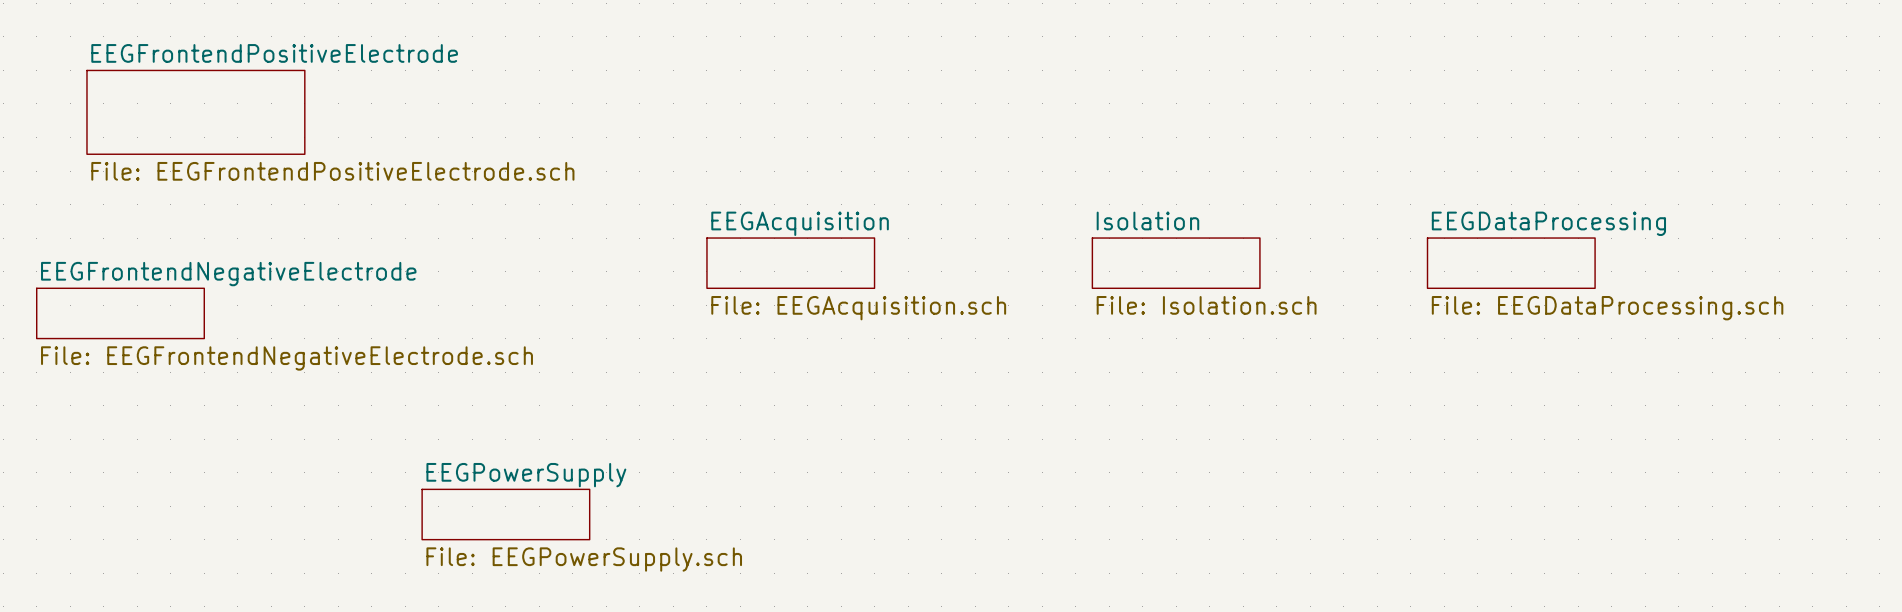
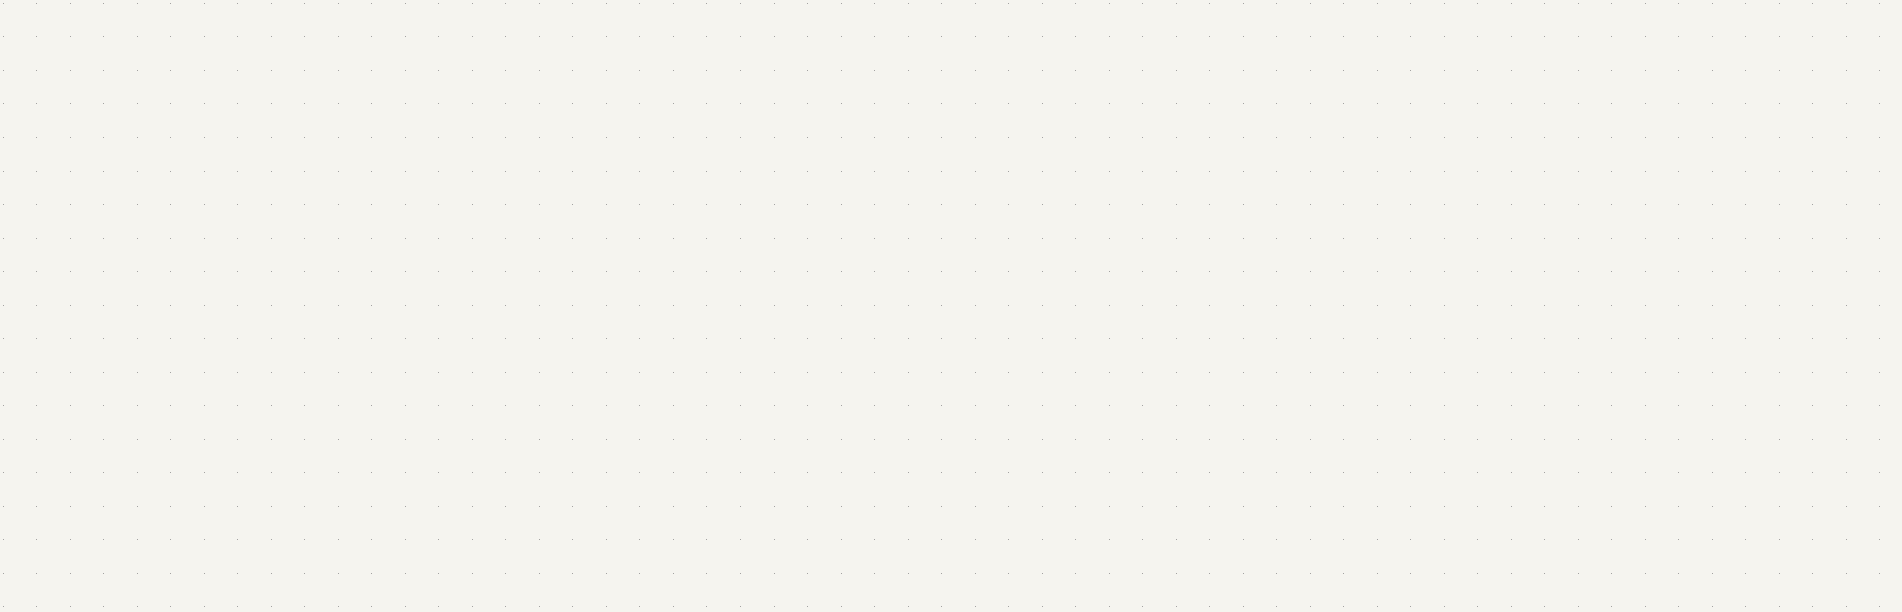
sheet EEGFrontendPositiveElectrode: File: EEGFrontendPositiveElectrode.sch (195, 112) -> none
sheet EEGAcquisition: File: EEGAcquisition.sch (790, 263) -> none
sheet Isolation: File: Isolation.sch (1176, 263) -> none
sheet EEGDataProcessing: File: EEGDataProcessing.sch (1511, 263) -> none
sheet EEGFrontendNegativeElectrode: File: EEGFrontendNegativeElectrode.sch (120, 313) -> none
sheet EEGPowerSupply: File: EEGPowerSupply.sch (505, 514) -> none

